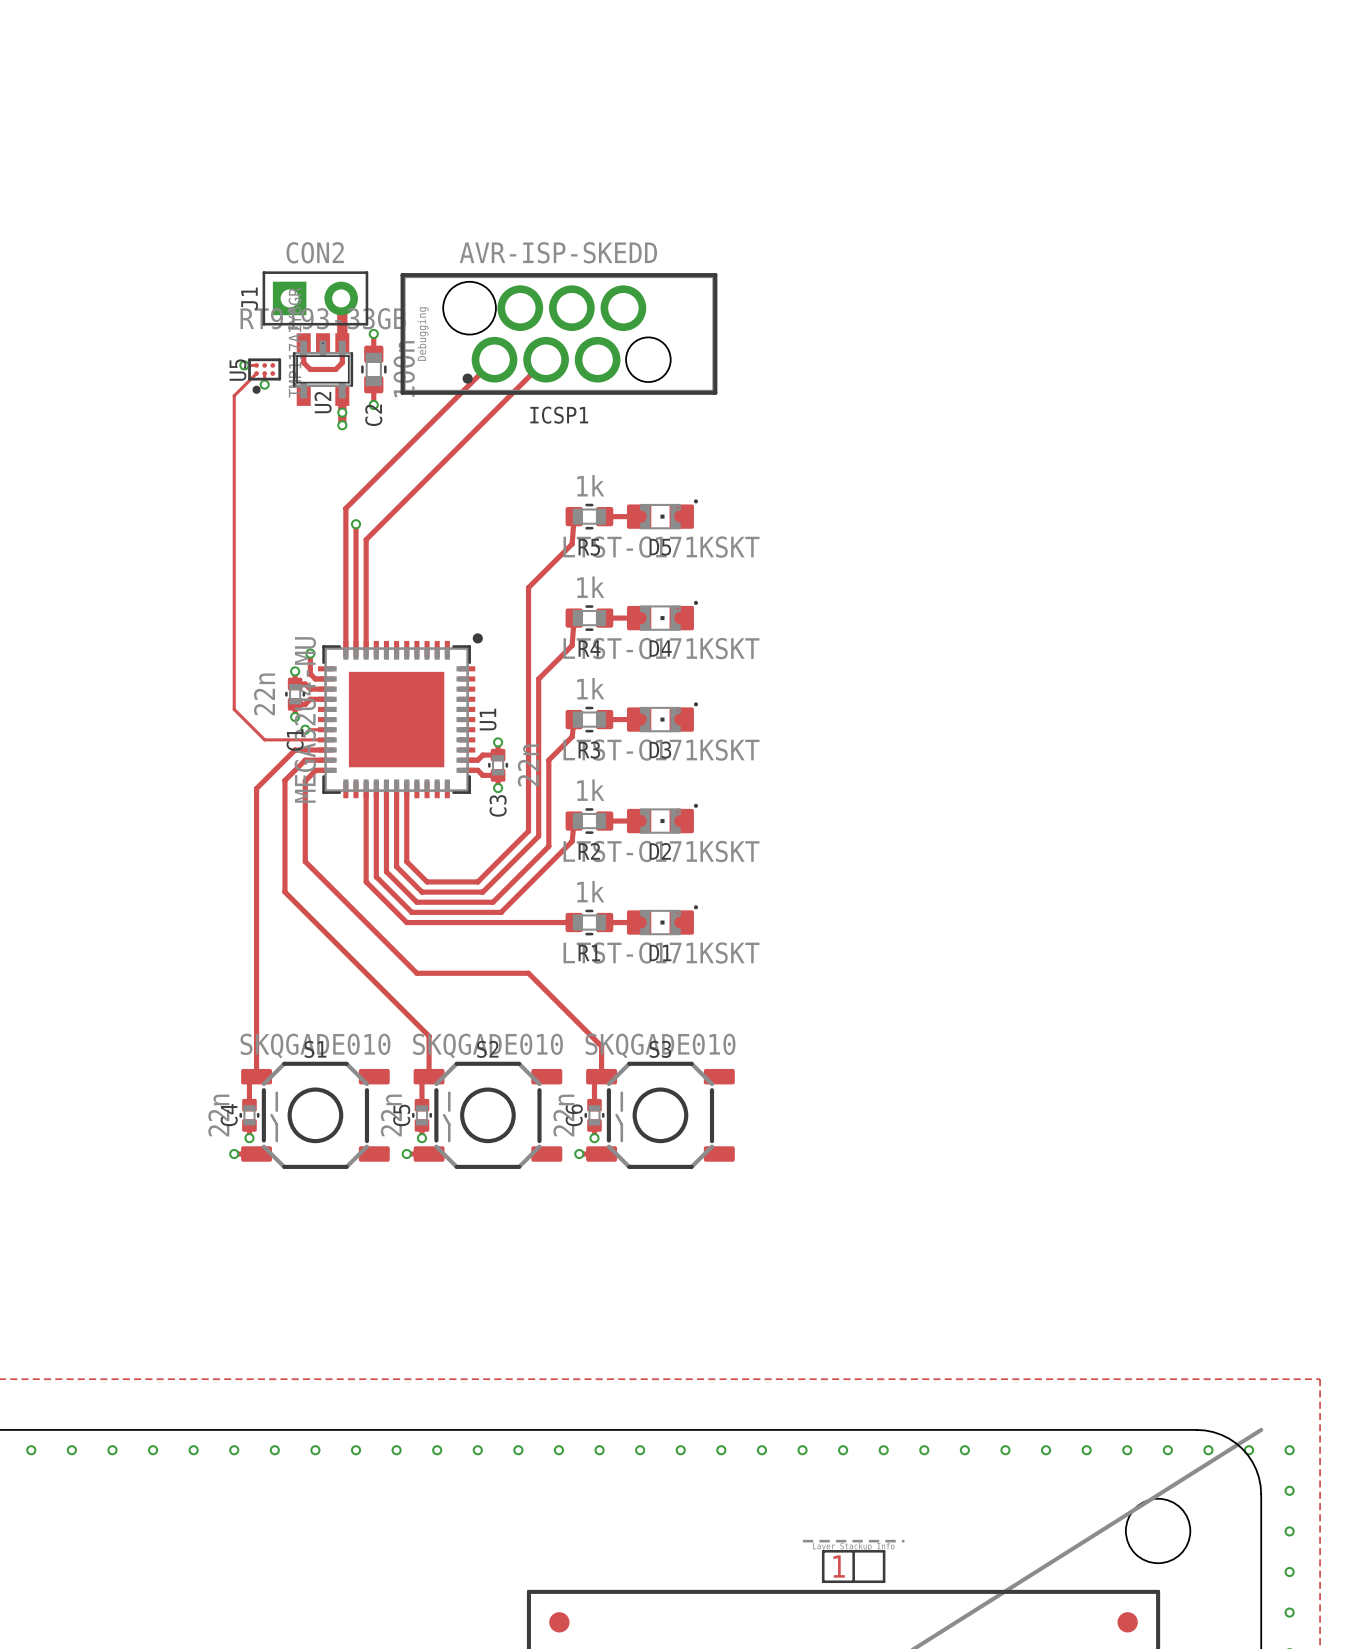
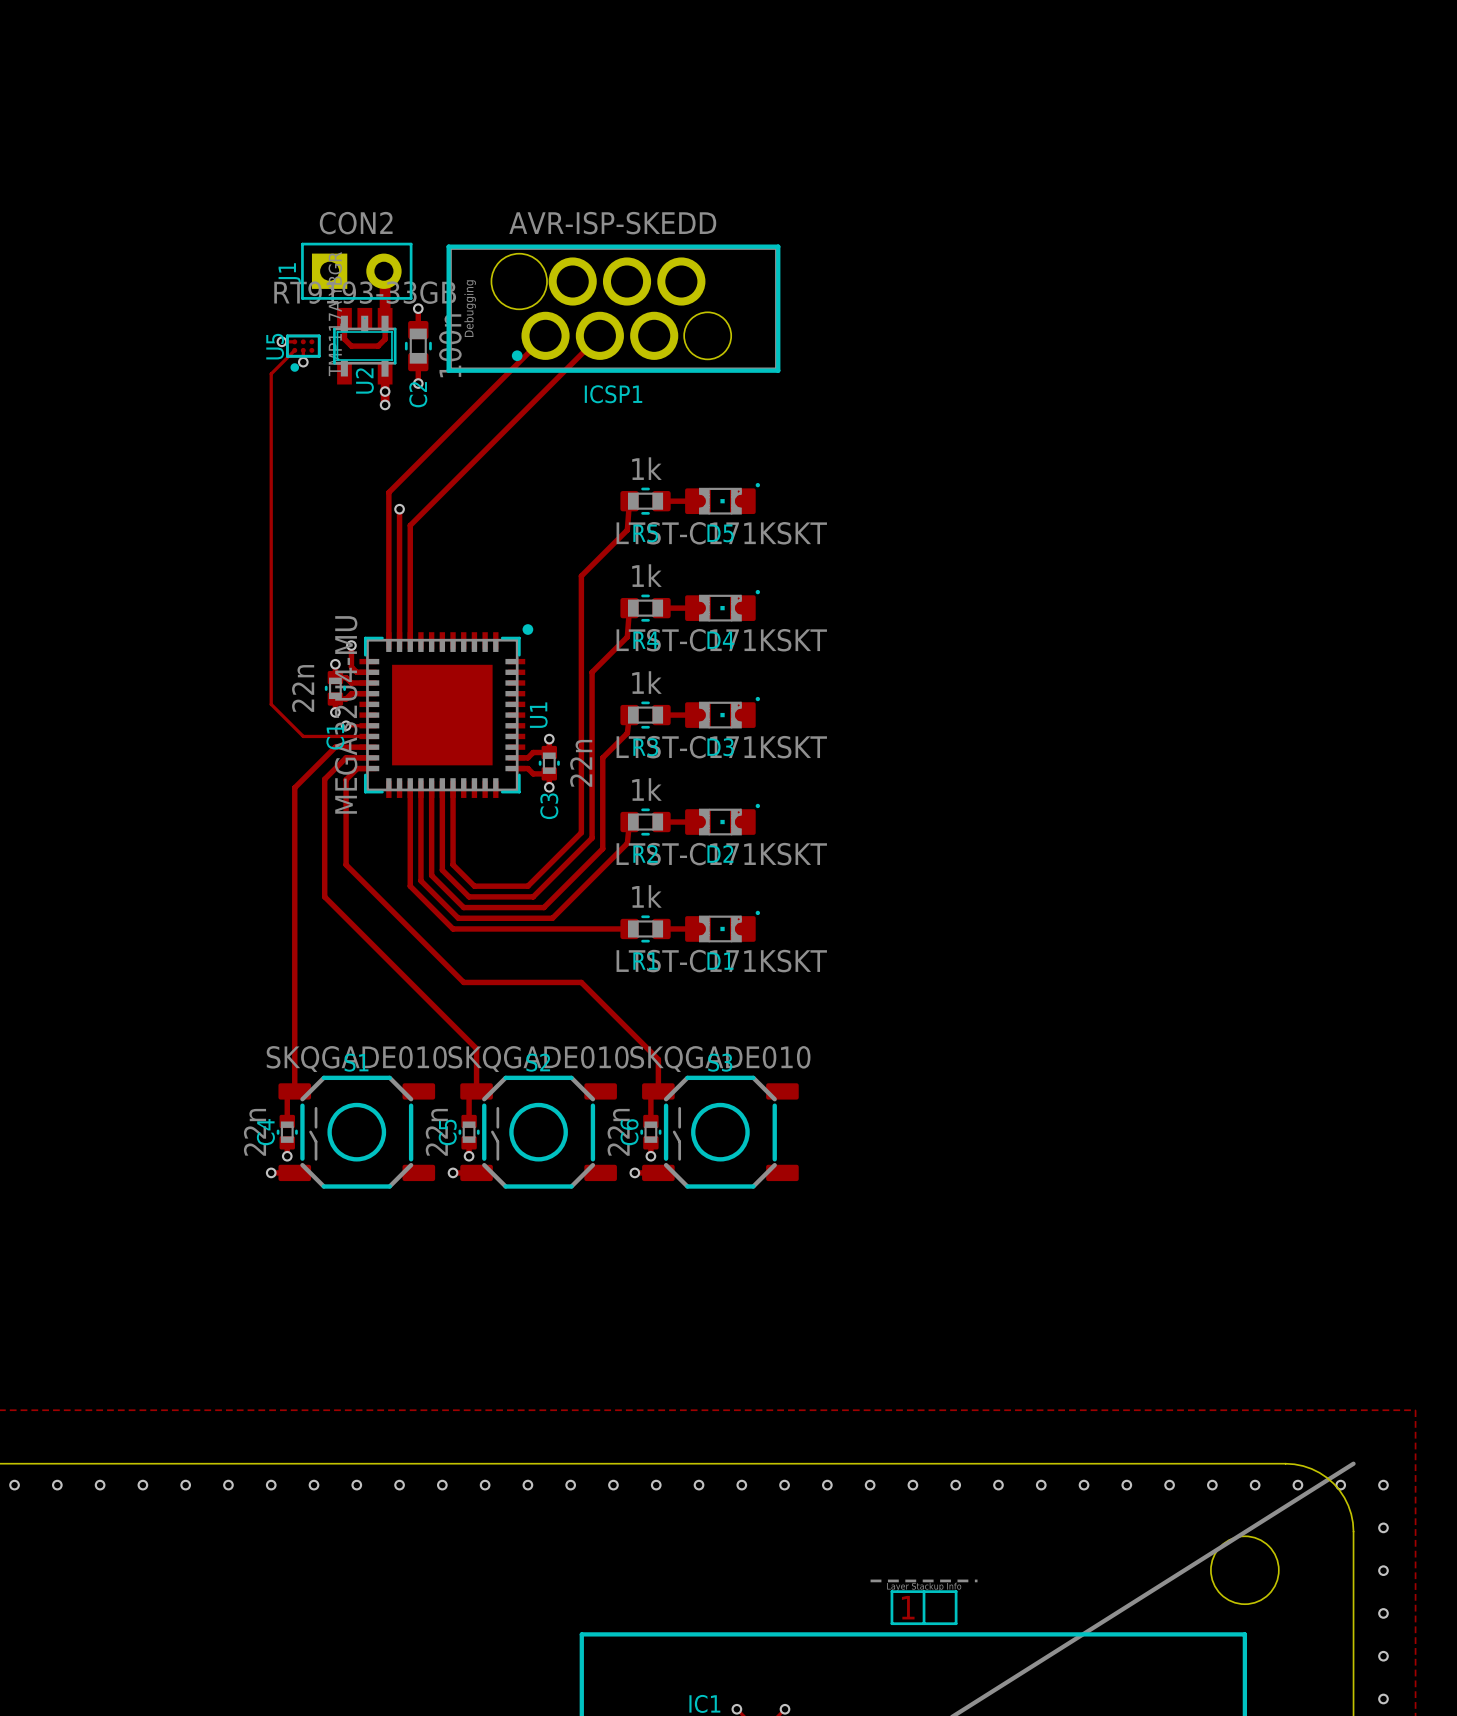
part: (559, 1622) -> none
part: (1127, 1622) -> none

